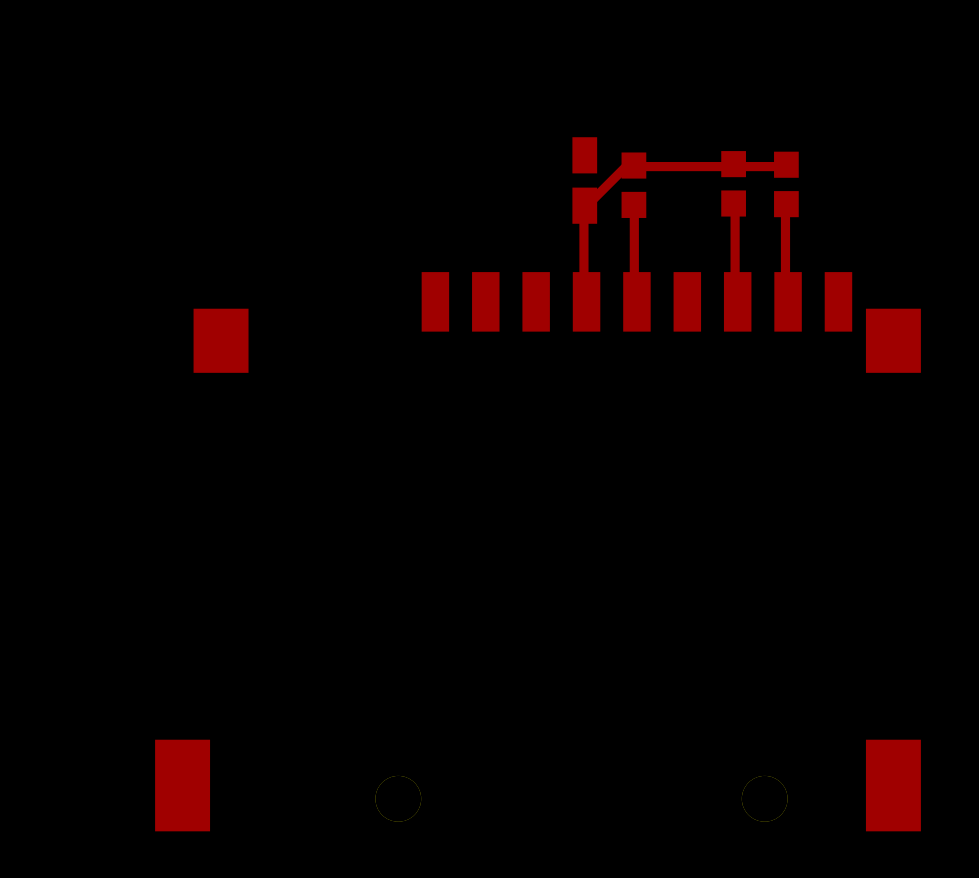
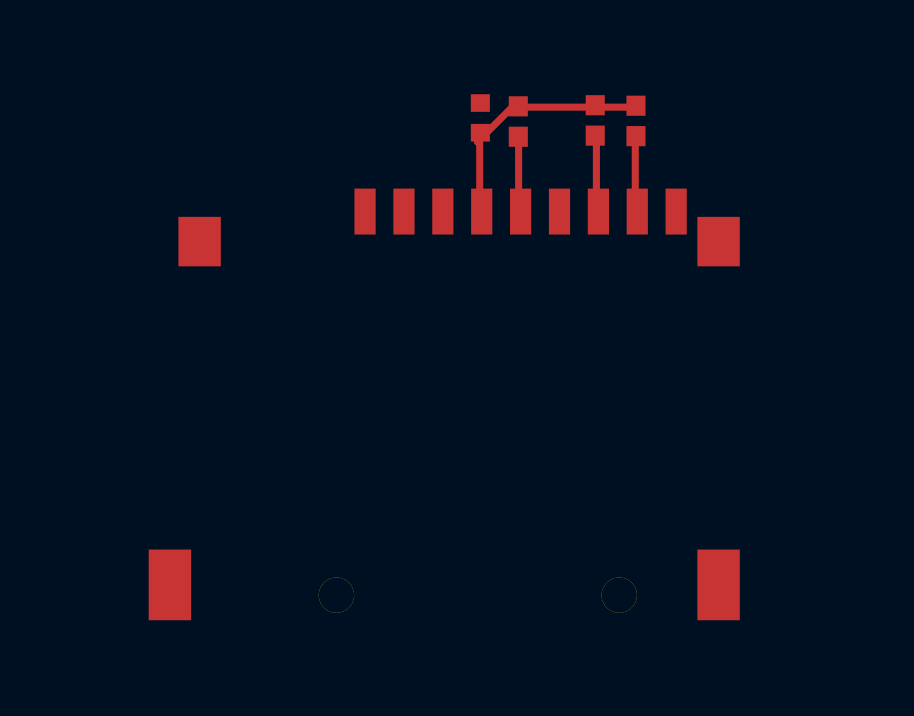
part footprint: [572, 137, 598, 224] -> [470, 94, 490, 142]

